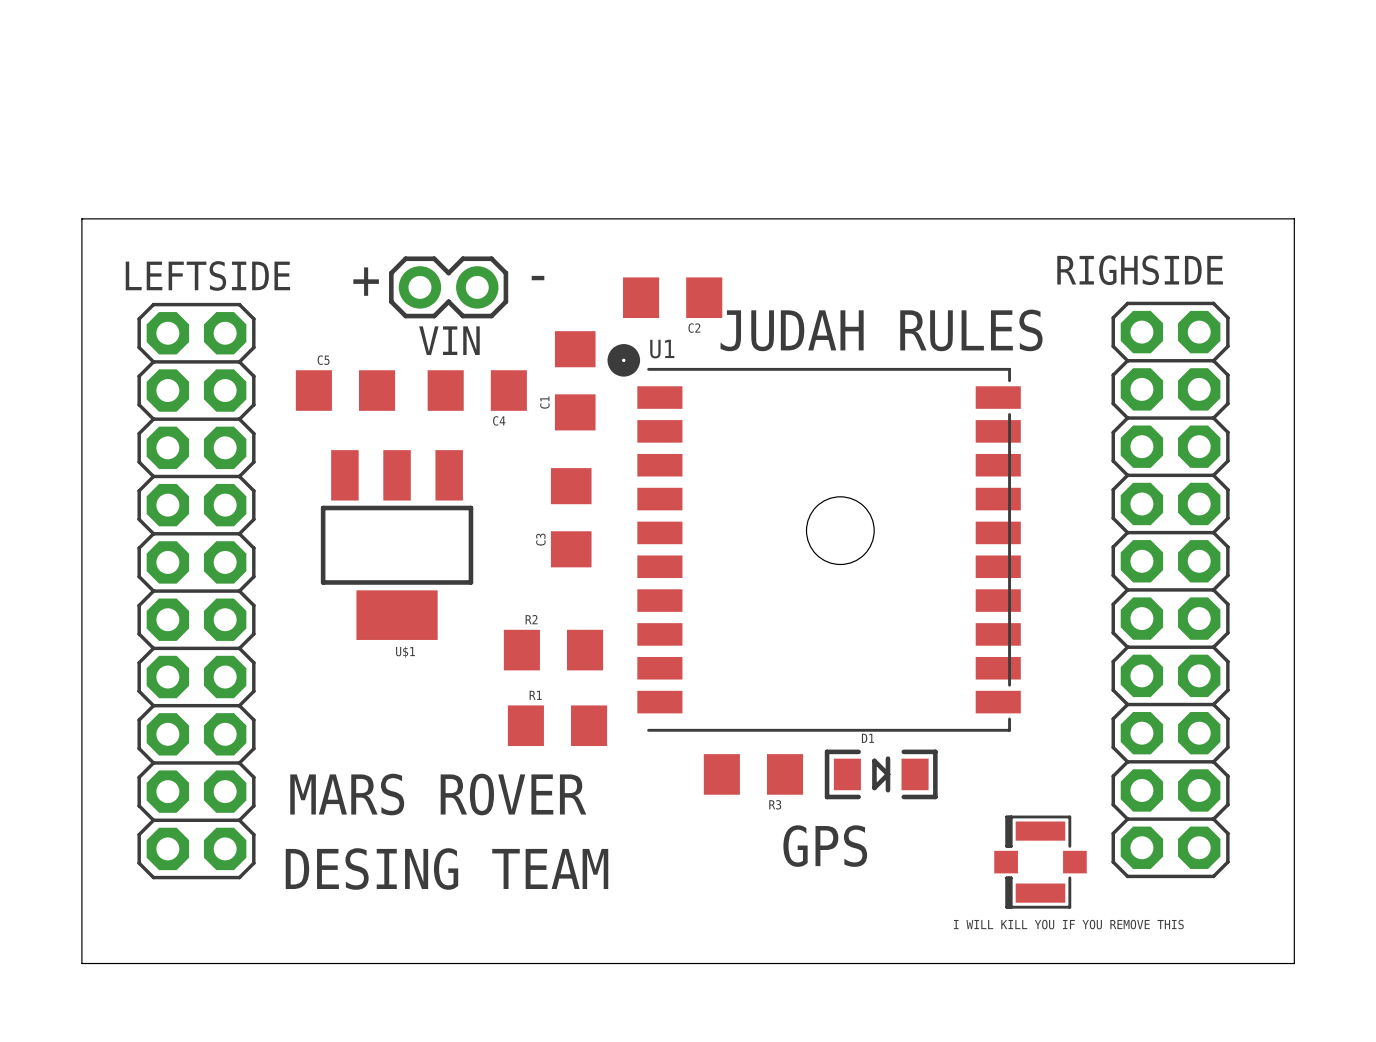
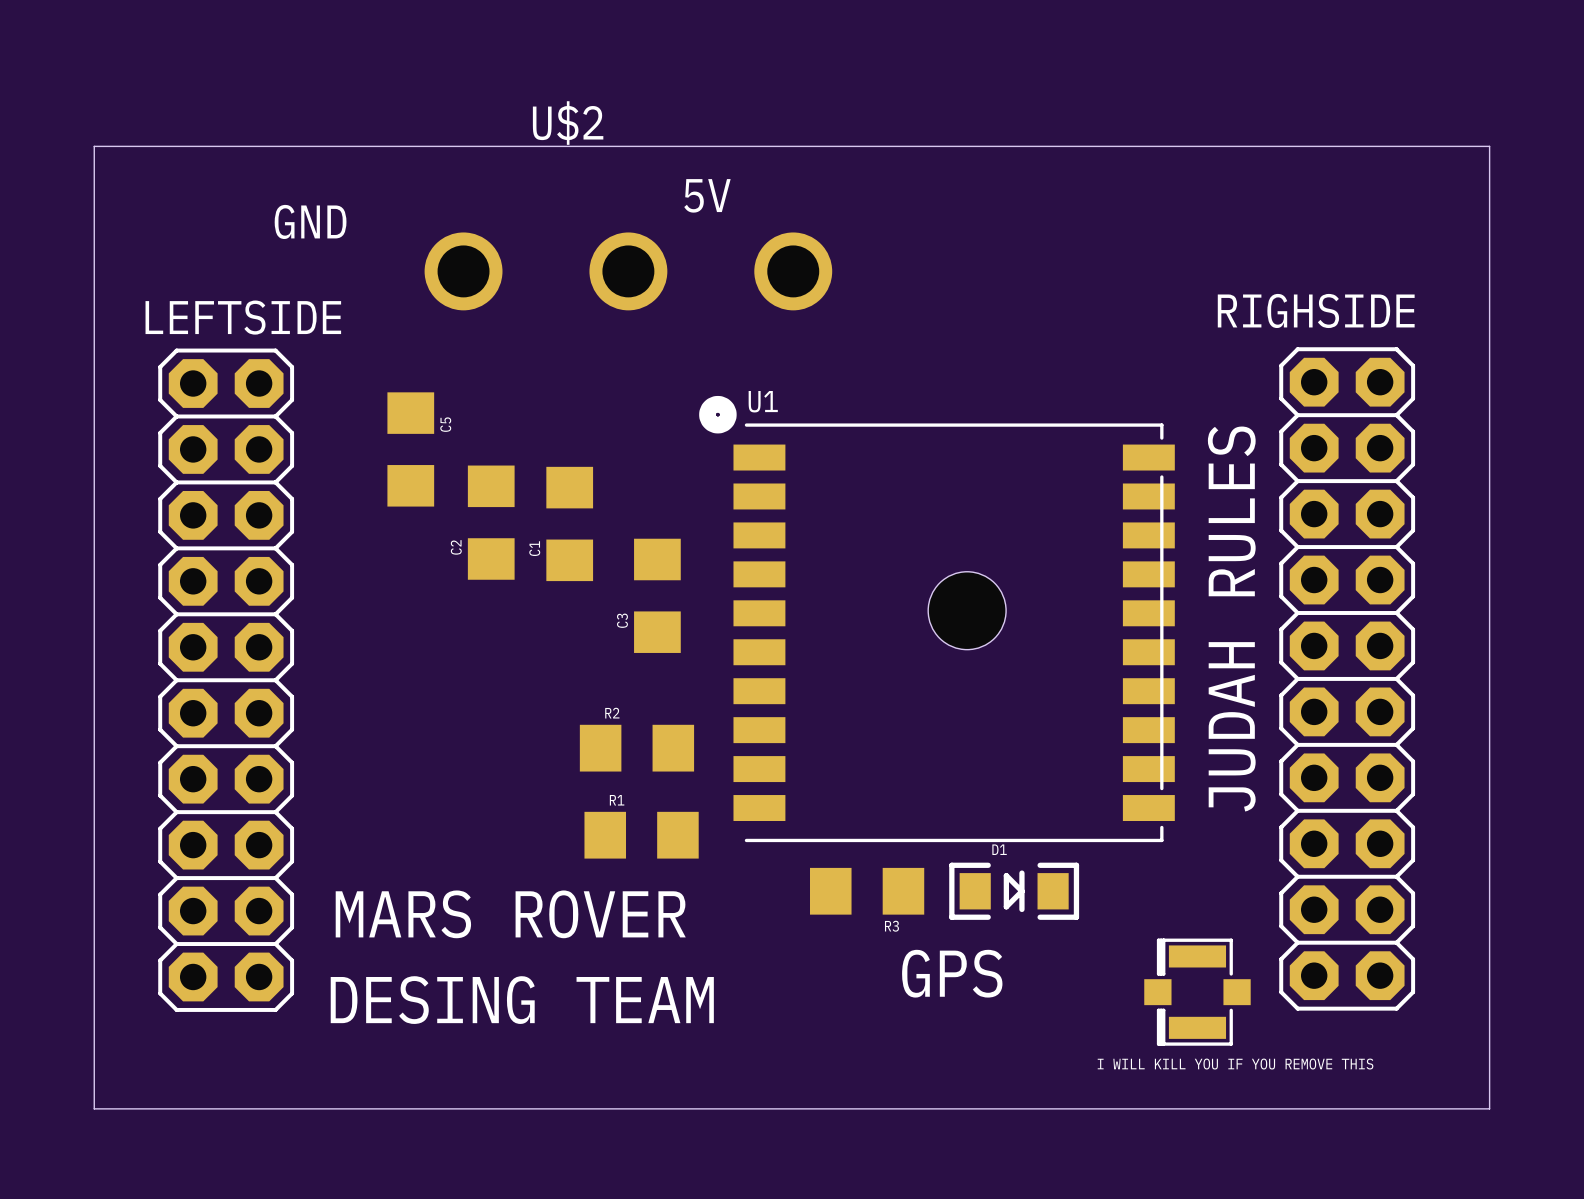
text: none -> 5V (707, 195)
text: none -> GND (310, 221)
board edge: (81, 218) (1294, 218) -> (94, 251) (94, 146) (1489, 146) (1489, 251)
U$2: none -> (628, 271)
text: - (538, 278) -> none
text: + (366, 281) -> none
VIN: (448, 287) -> none
C2 rotation: 0° (672, 297) -> 90° clockwise (491, 522)
C2 position: (672, 297) -> (491, 522)
text rotation: 0° (881, 330) -> 90° counterclockwise (1231, 619)
C1 position: (575, 380) -> (569, 523)
C5 rotation: 0° (345, 390) -> 90° clockwise (410, 449)
C4: (477, 390) -> none
U$1: (397, 545) -> none

